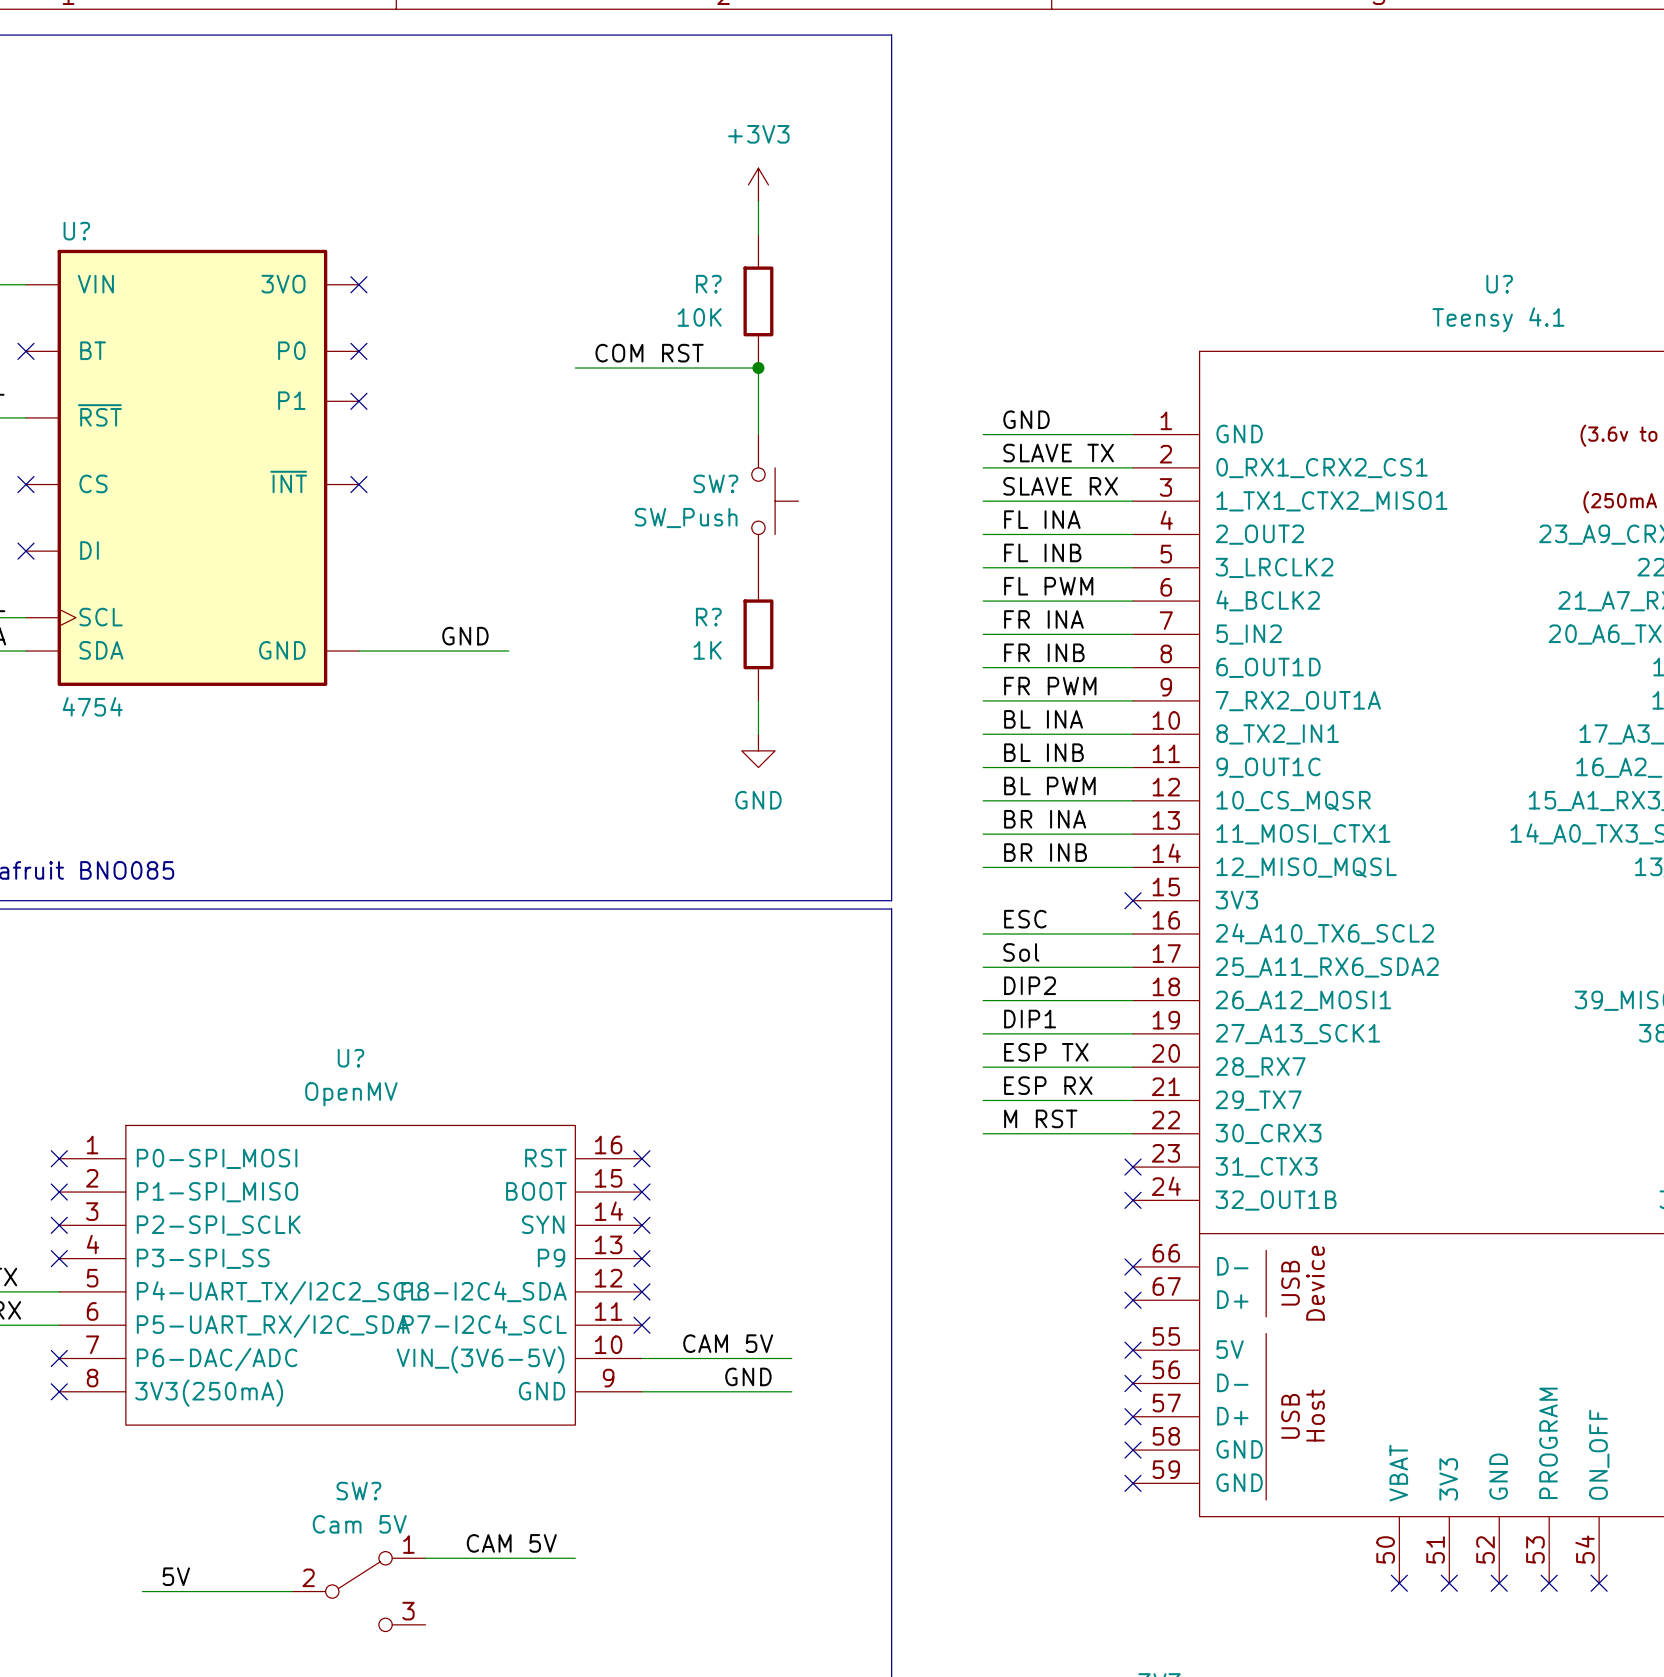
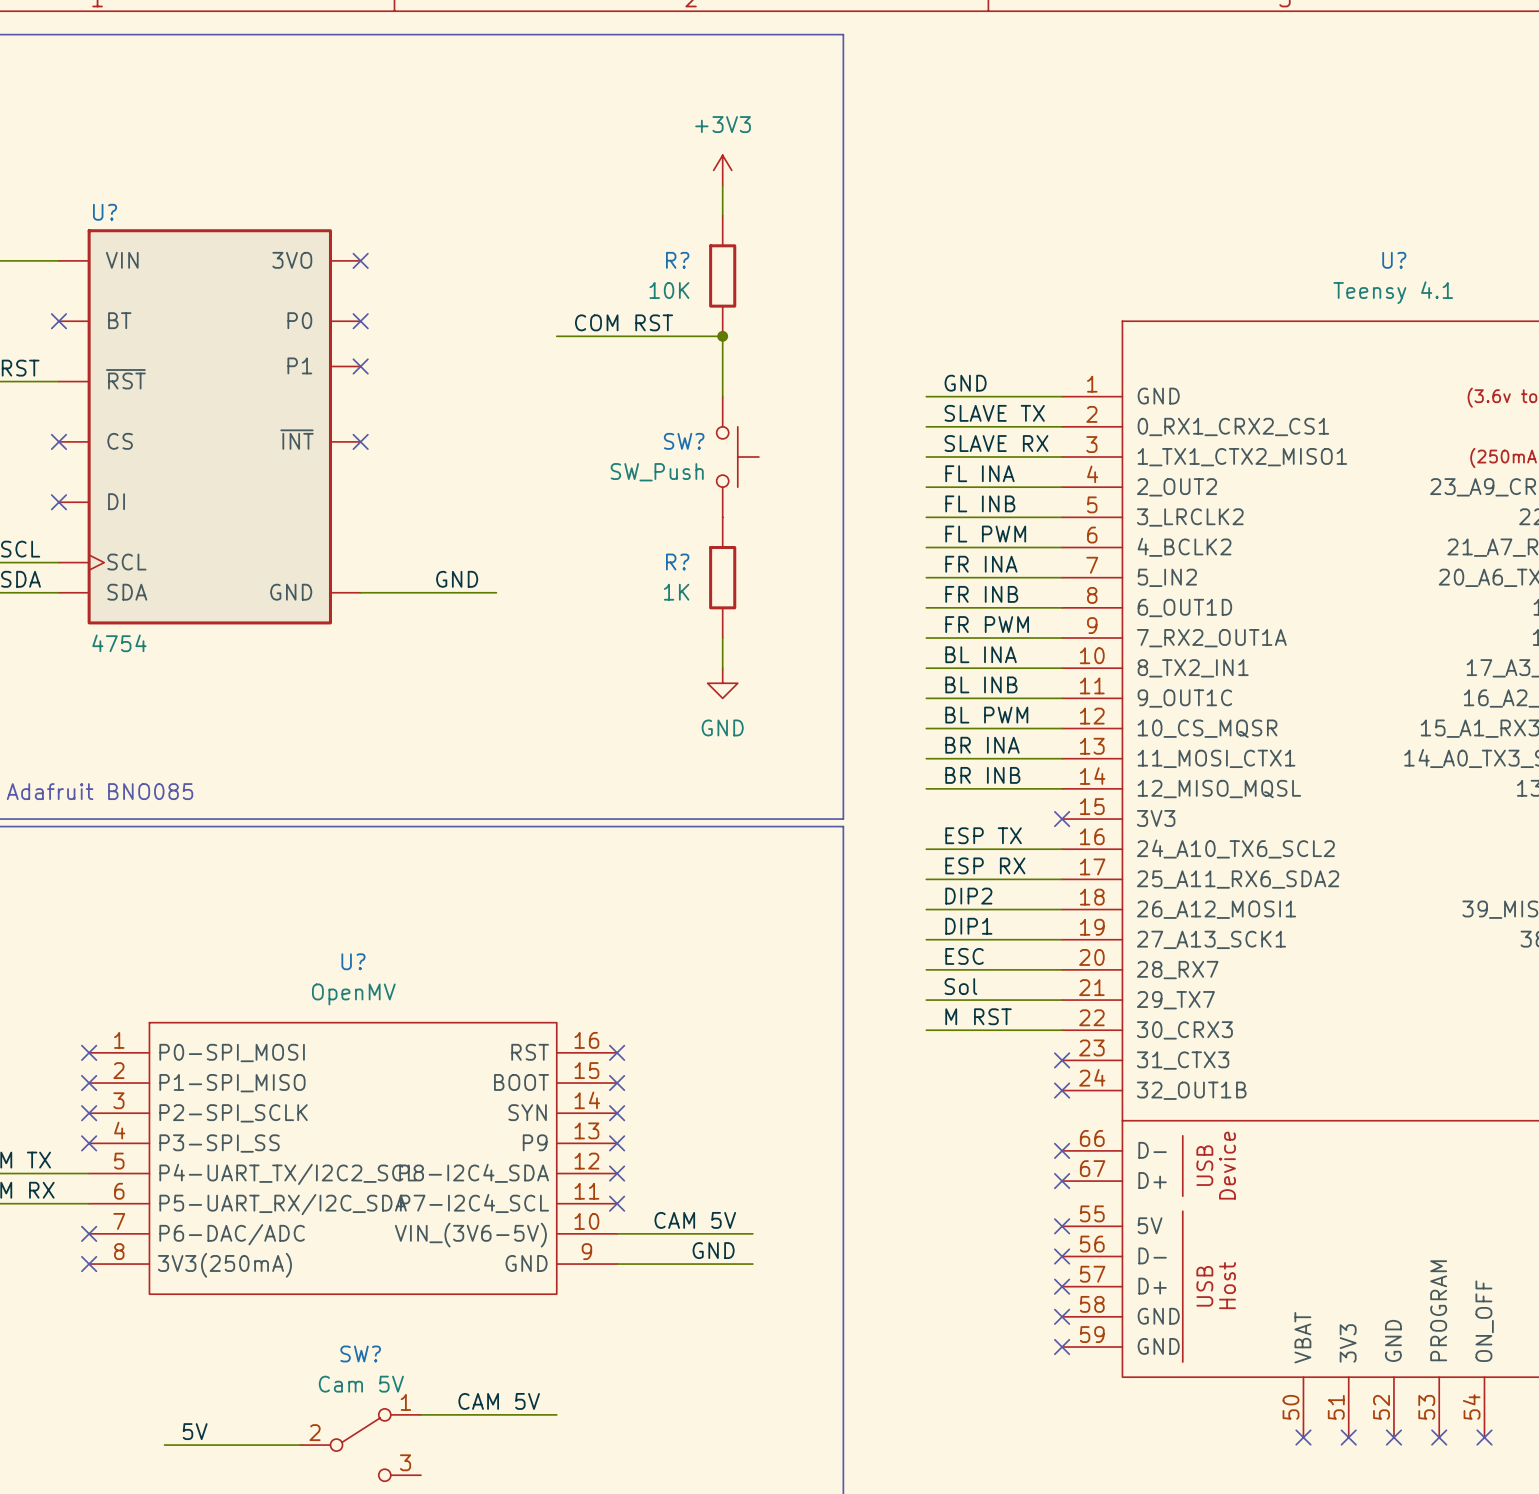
label: ESC (1025, 919) -> ESP TX (983, 835)
label: Sol (1021, 952) -> ESP RX (985, 865)
label: ESP TX (1046, 1052) -> ESC (964, 956)
label: ESP RX (1048, 1085) -> Sol (960, 986)

